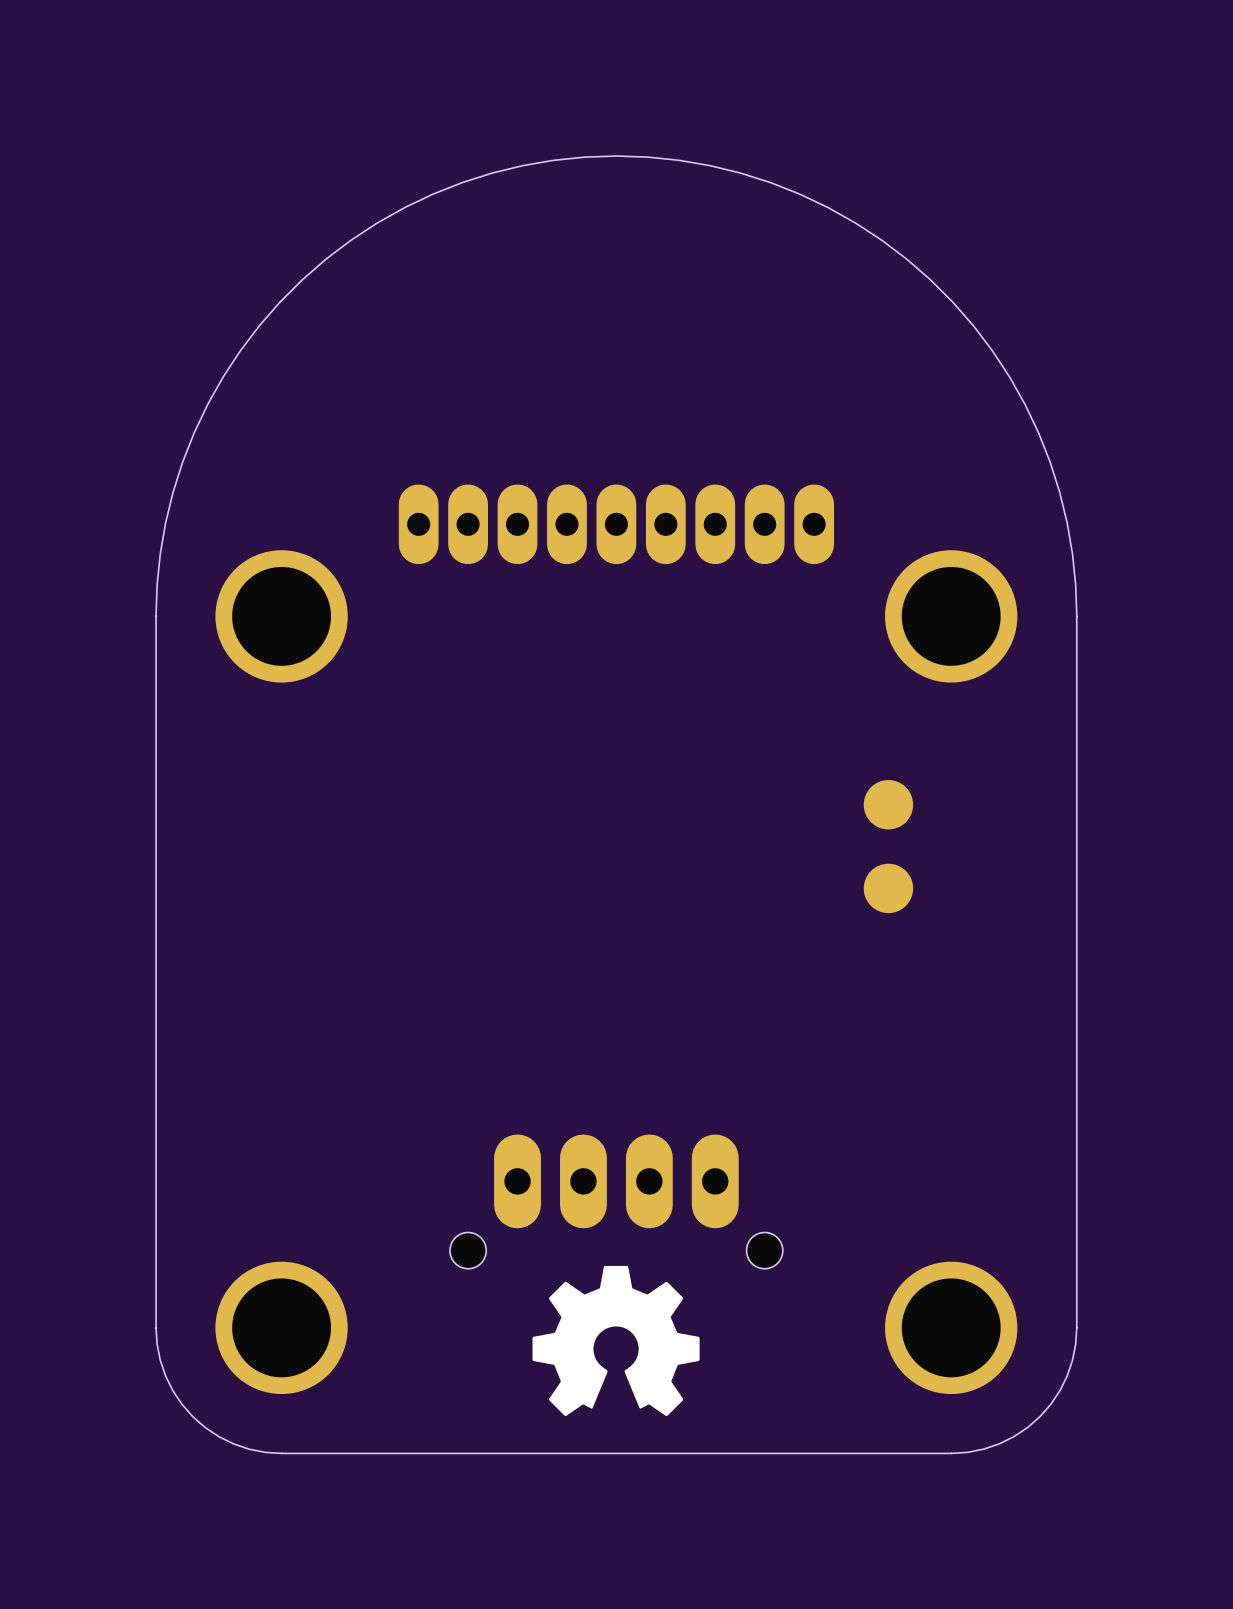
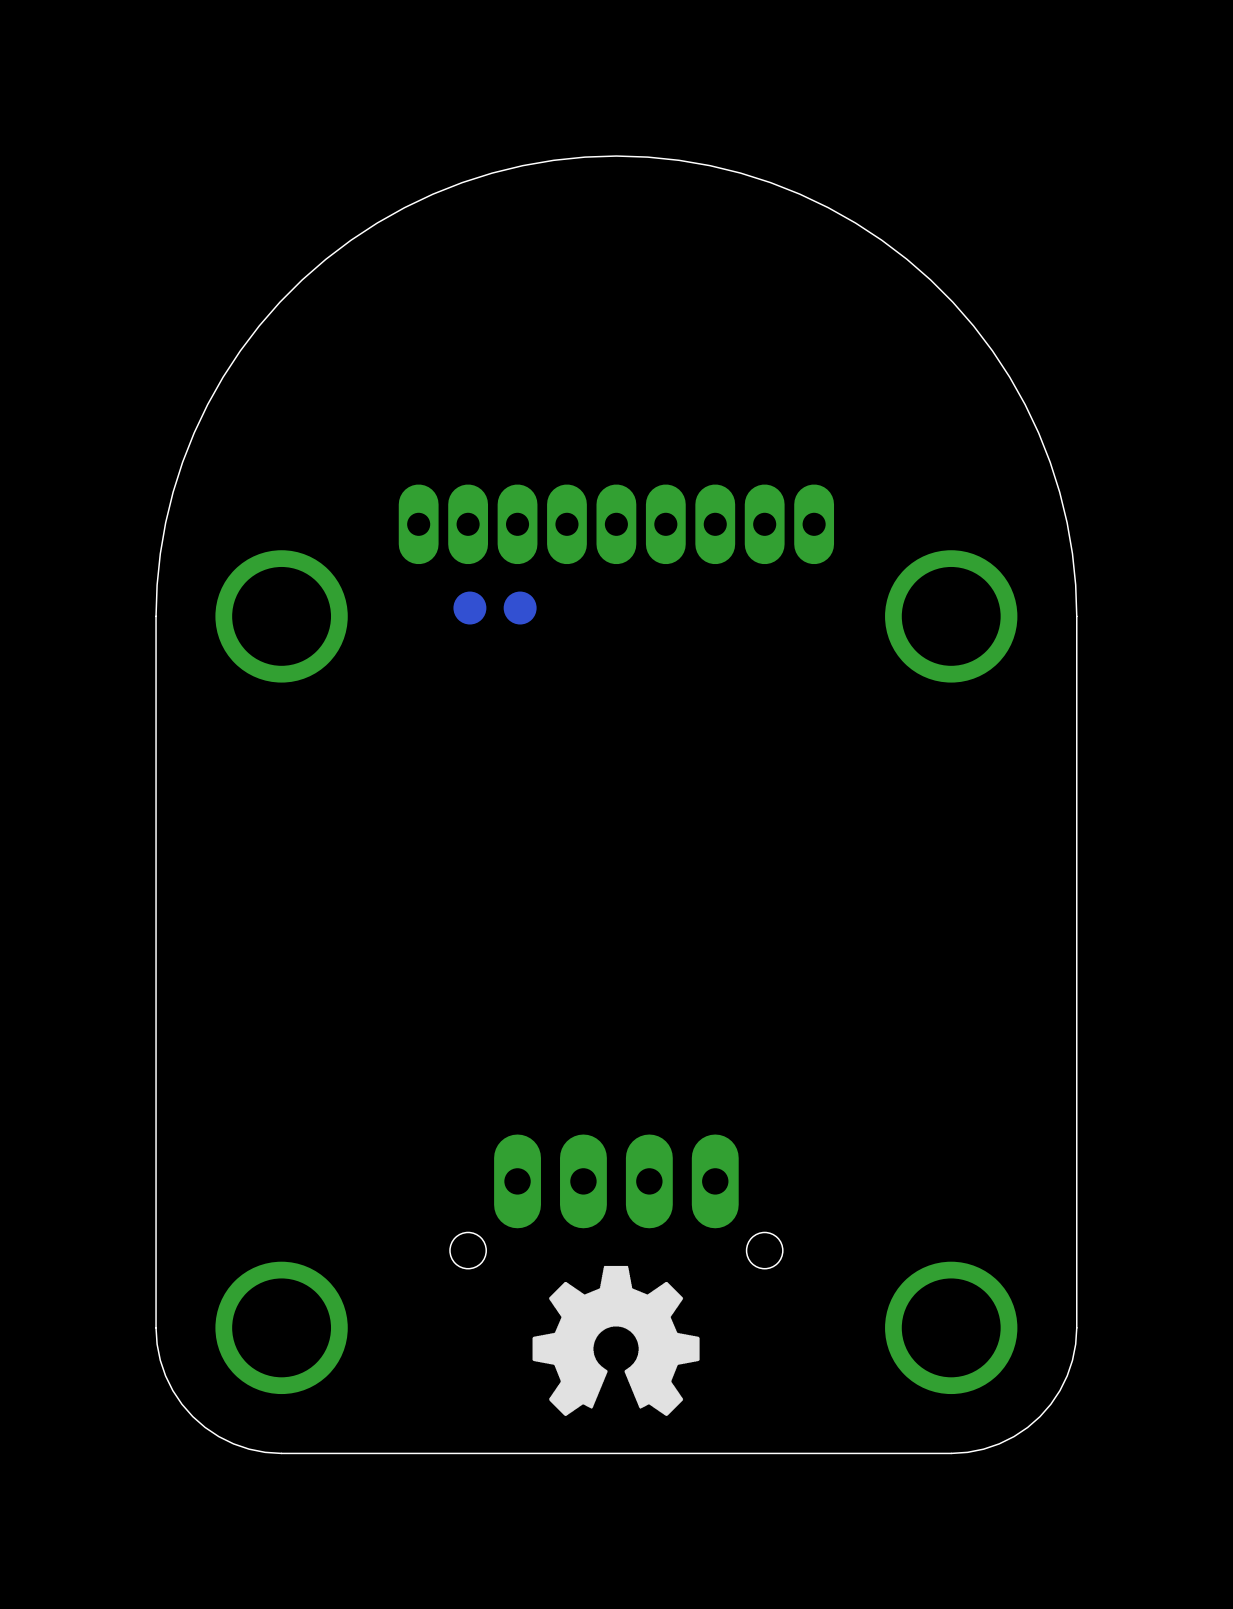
part: none -> (469, 608)
part: none -> (520, 608)
part: (888, 804) -> none
part: (888, 888) -> none

